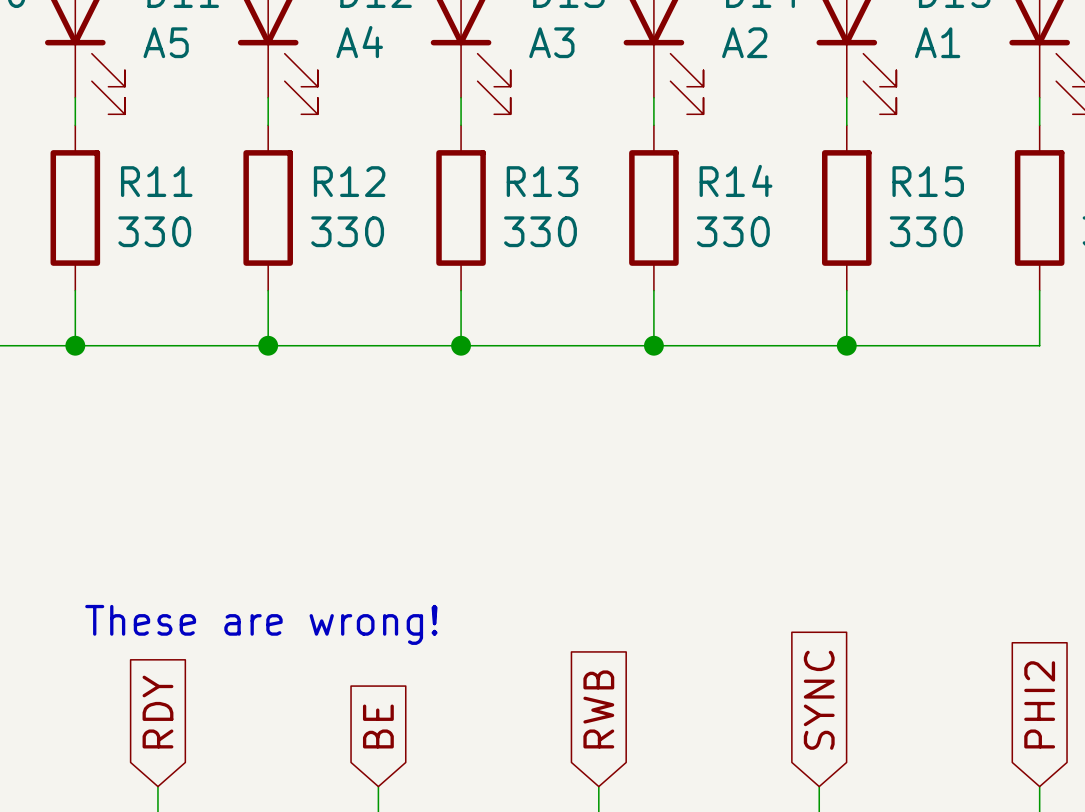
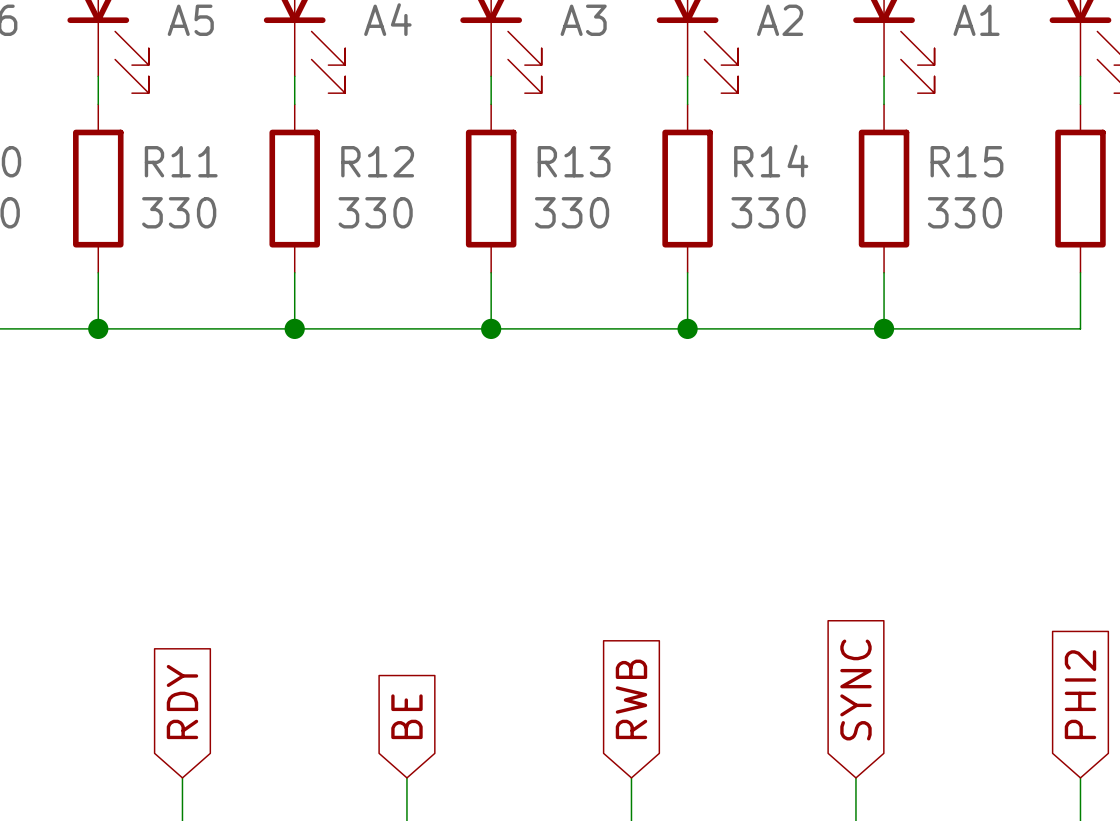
text: These are wrong! (261, 624) -> none

